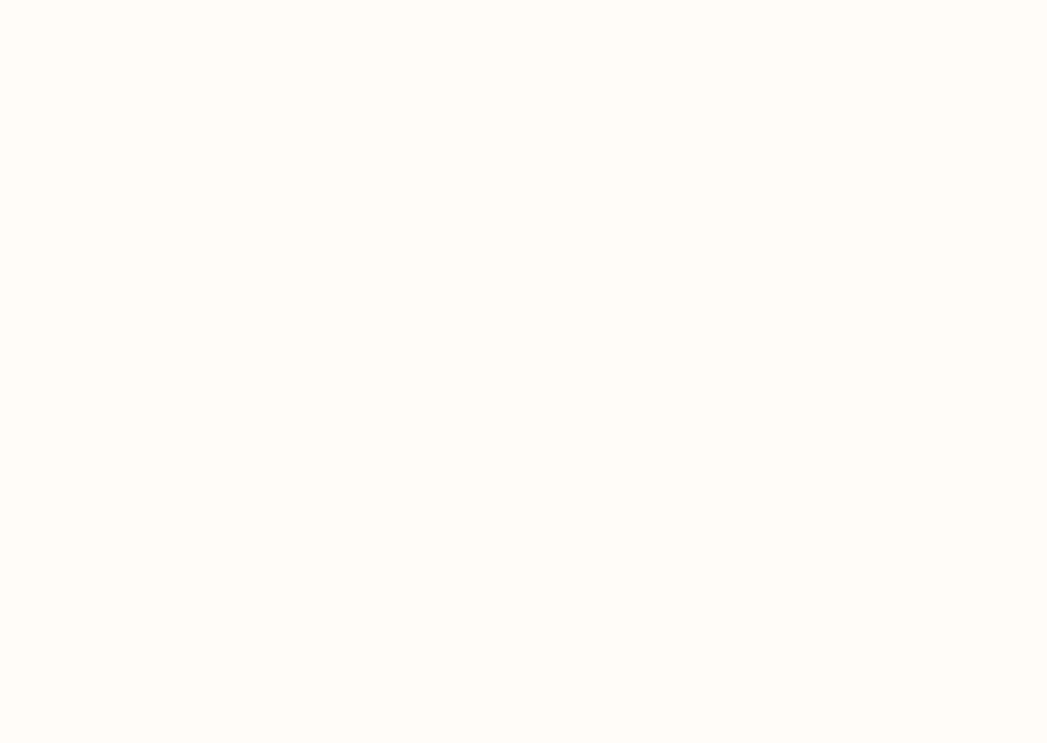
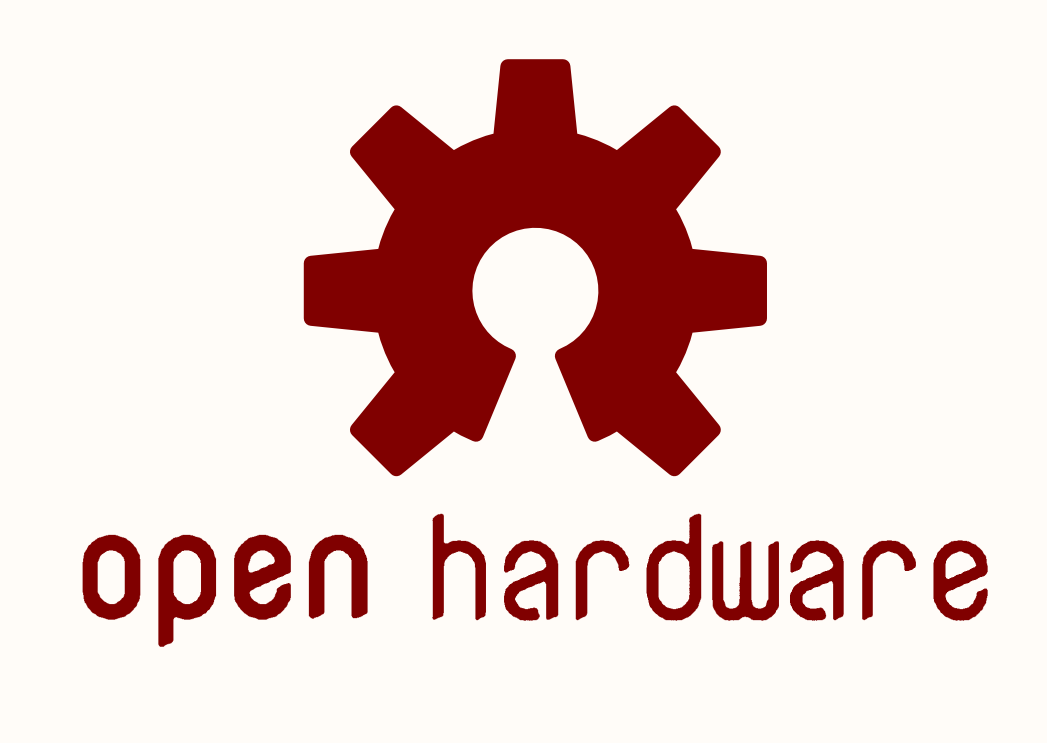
part: none -> (535, 352)

